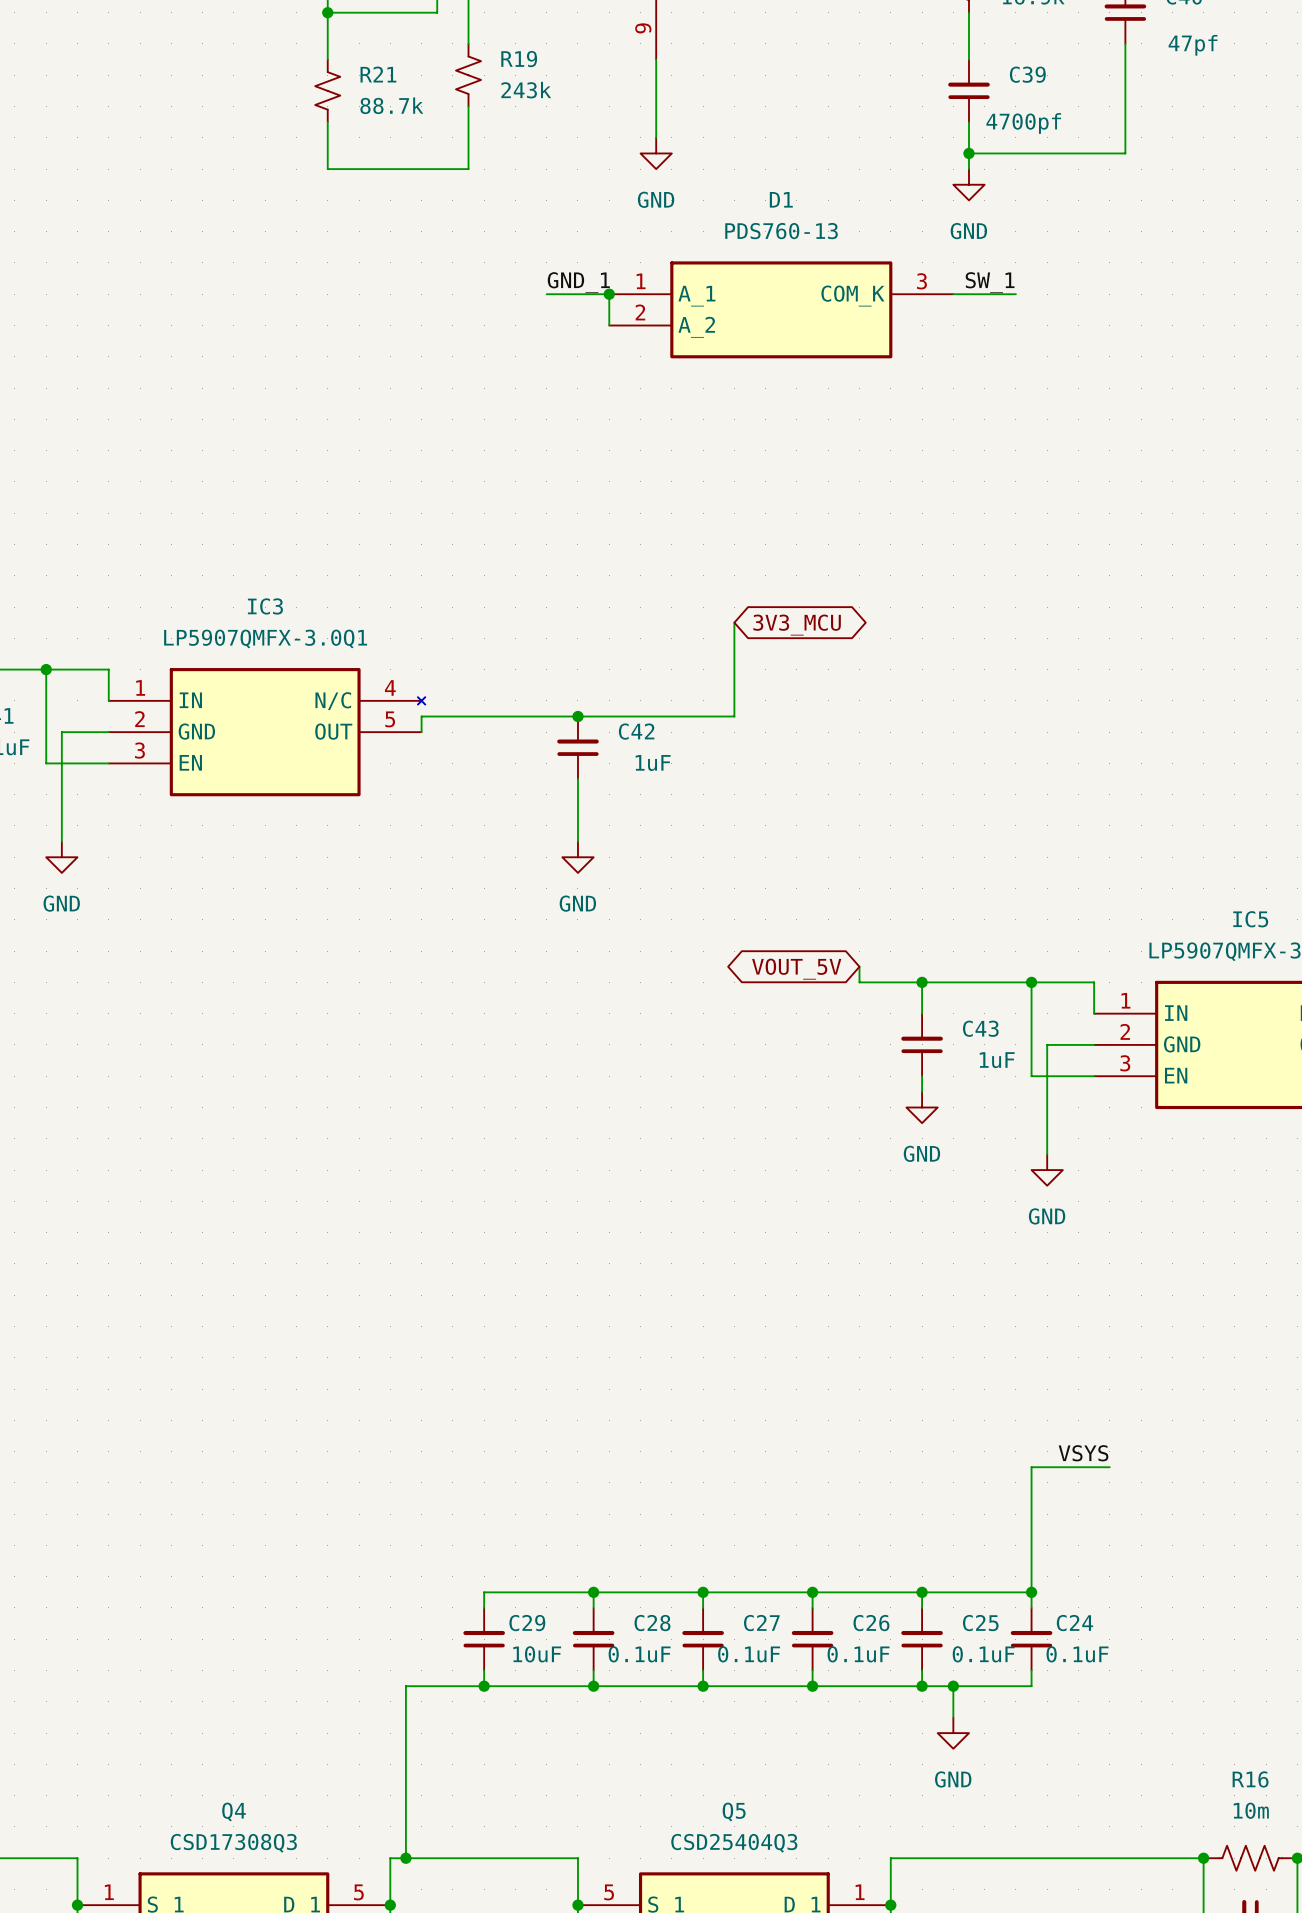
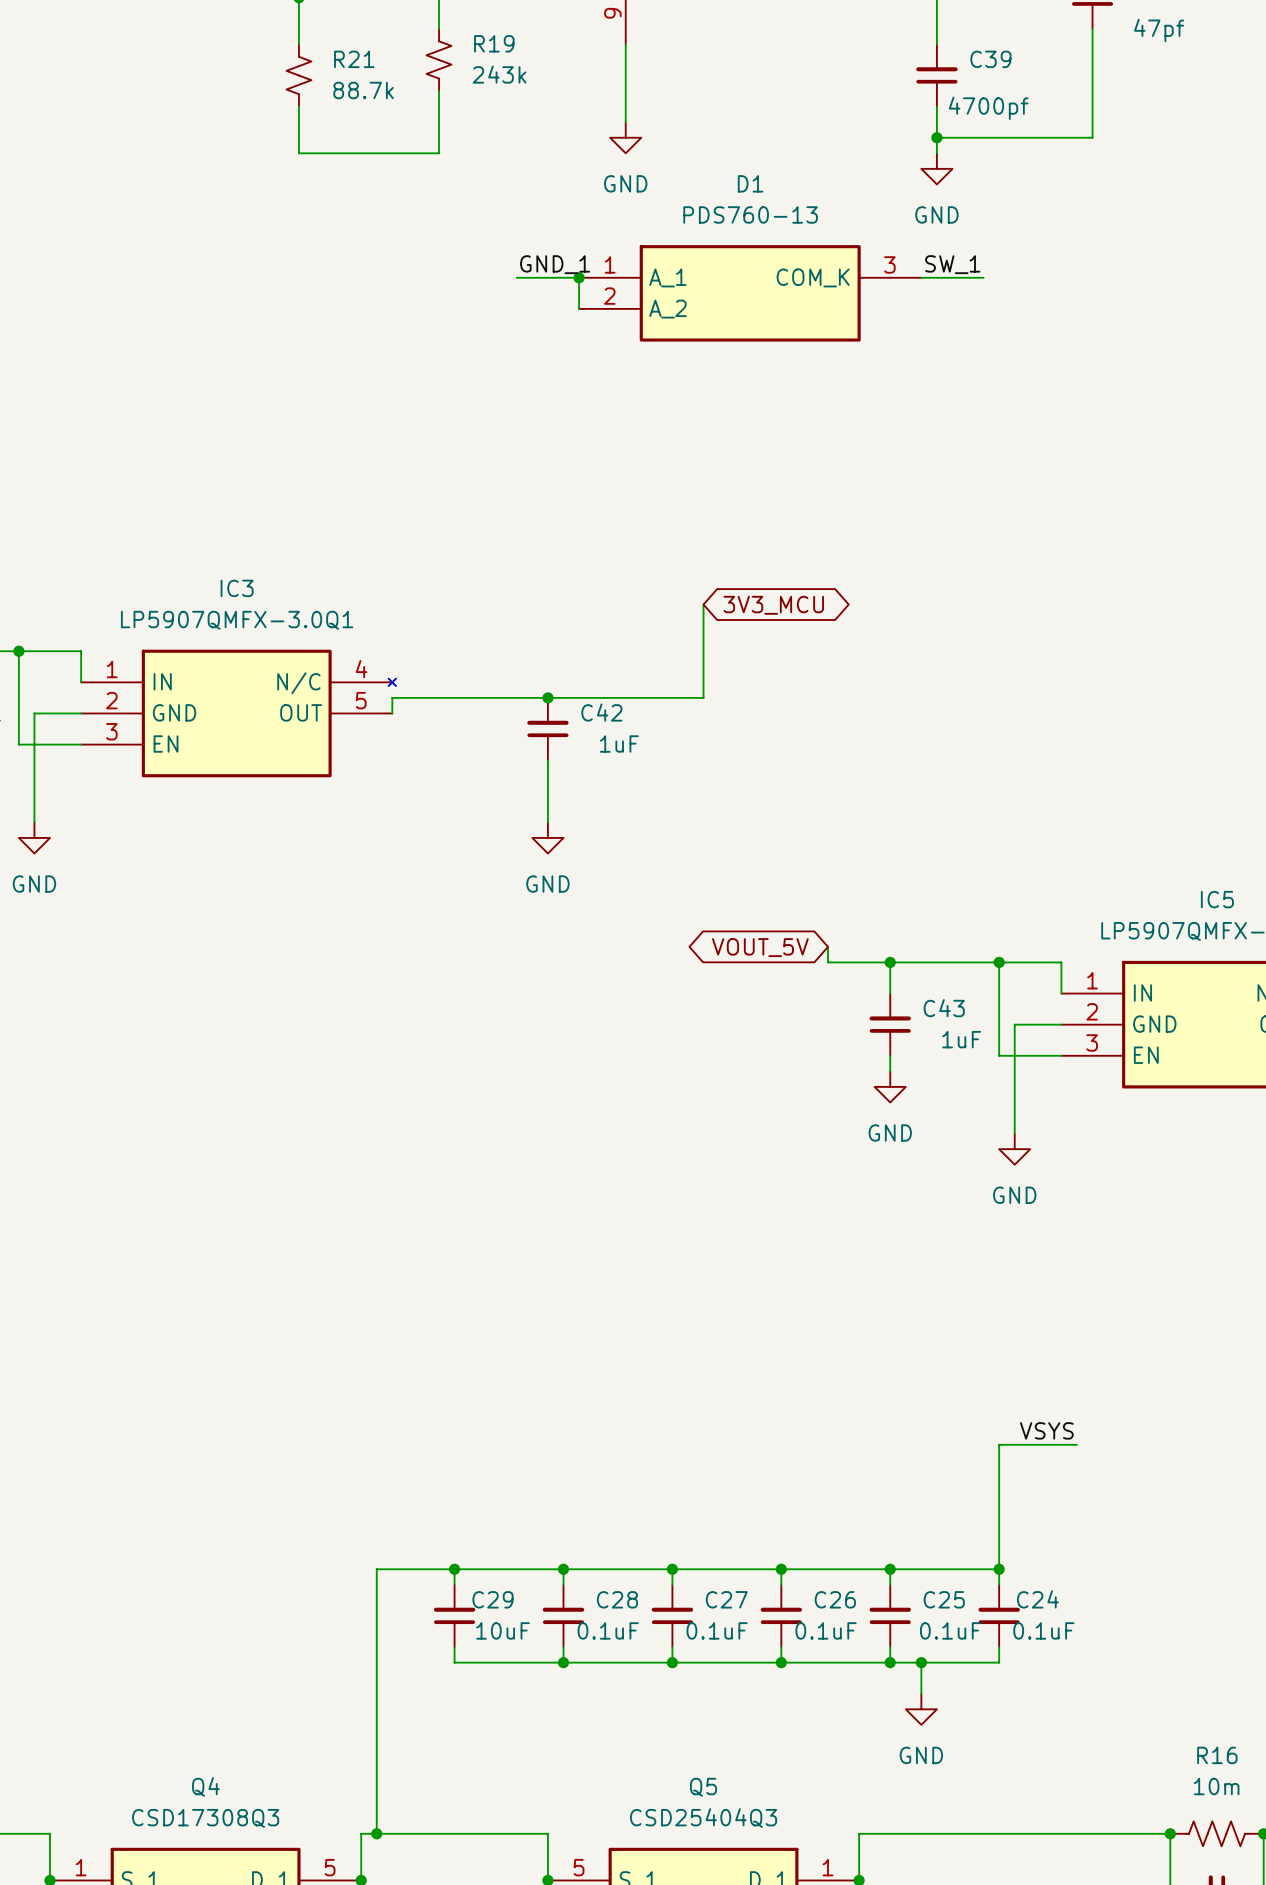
junction: none -> (454, 1569)
wire: (405, 1686) (484, 1686) -> (376, 1662) (376, 1569) (454, 1569)
junction: (484, 1686) -> none

